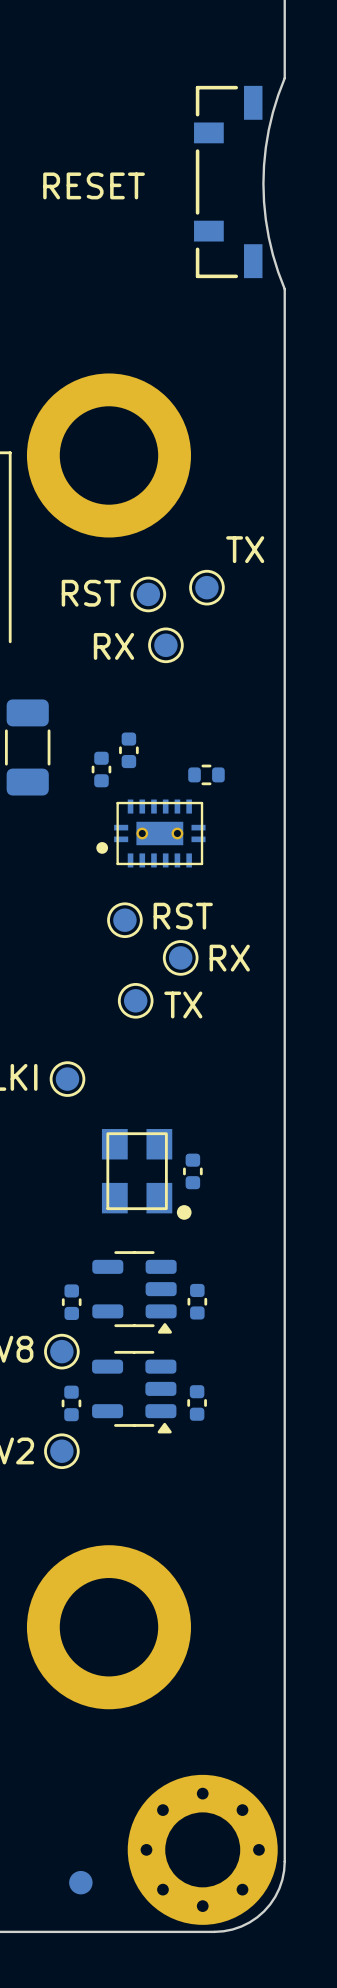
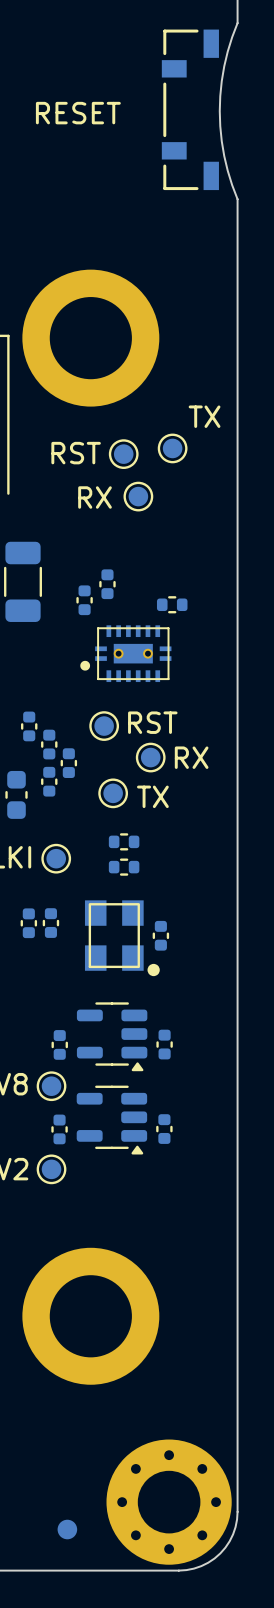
part: none -> (29, 726)
part: none -> (49, 744)
part: none -> (68, 763)
part: none -> (49, 781)
part: none -> (16, 794)
part: none -> (124, 841)
part: none -> (124, 867)
part: none -> (28, 923)
part: none -> (50, 923)

